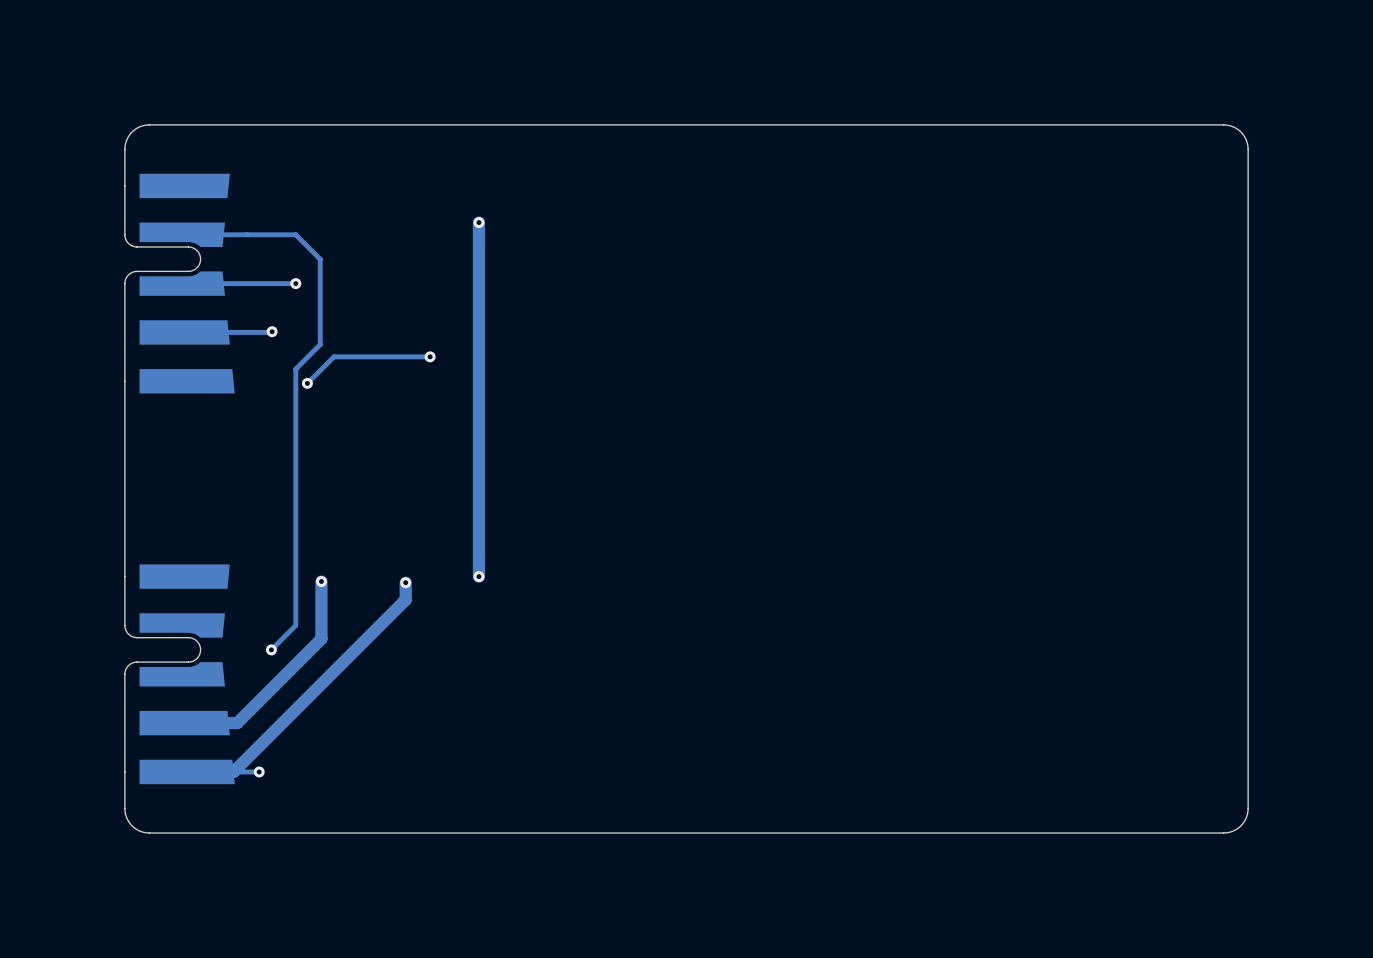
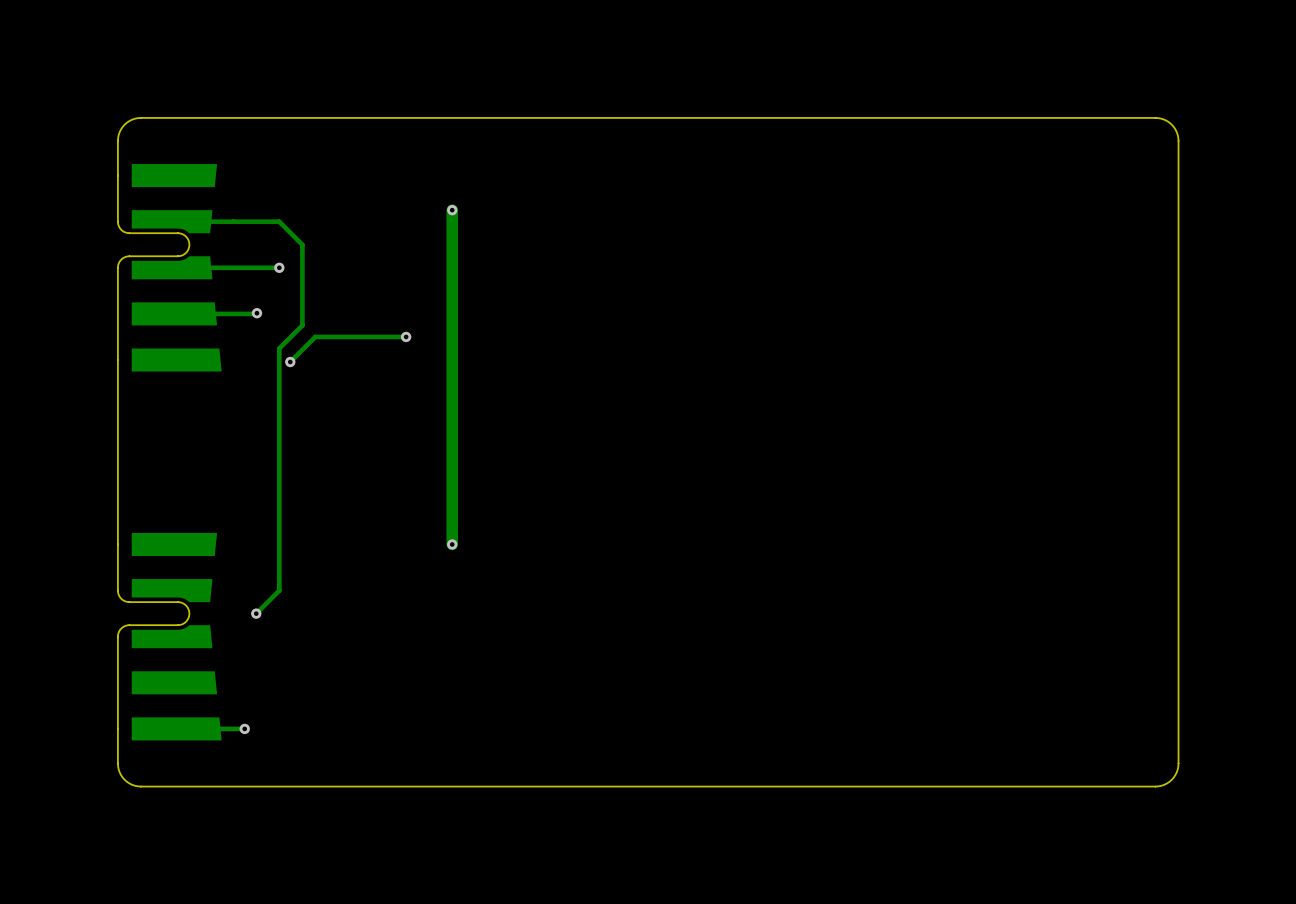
track: (321, 581) (321, 638) (237, 723) (183, 723) -> none
via: (321, 581) -> none
track: (405, 582) (405, 599) (233, 771) (185, 771) -> none
via: (405, 582) -> none

